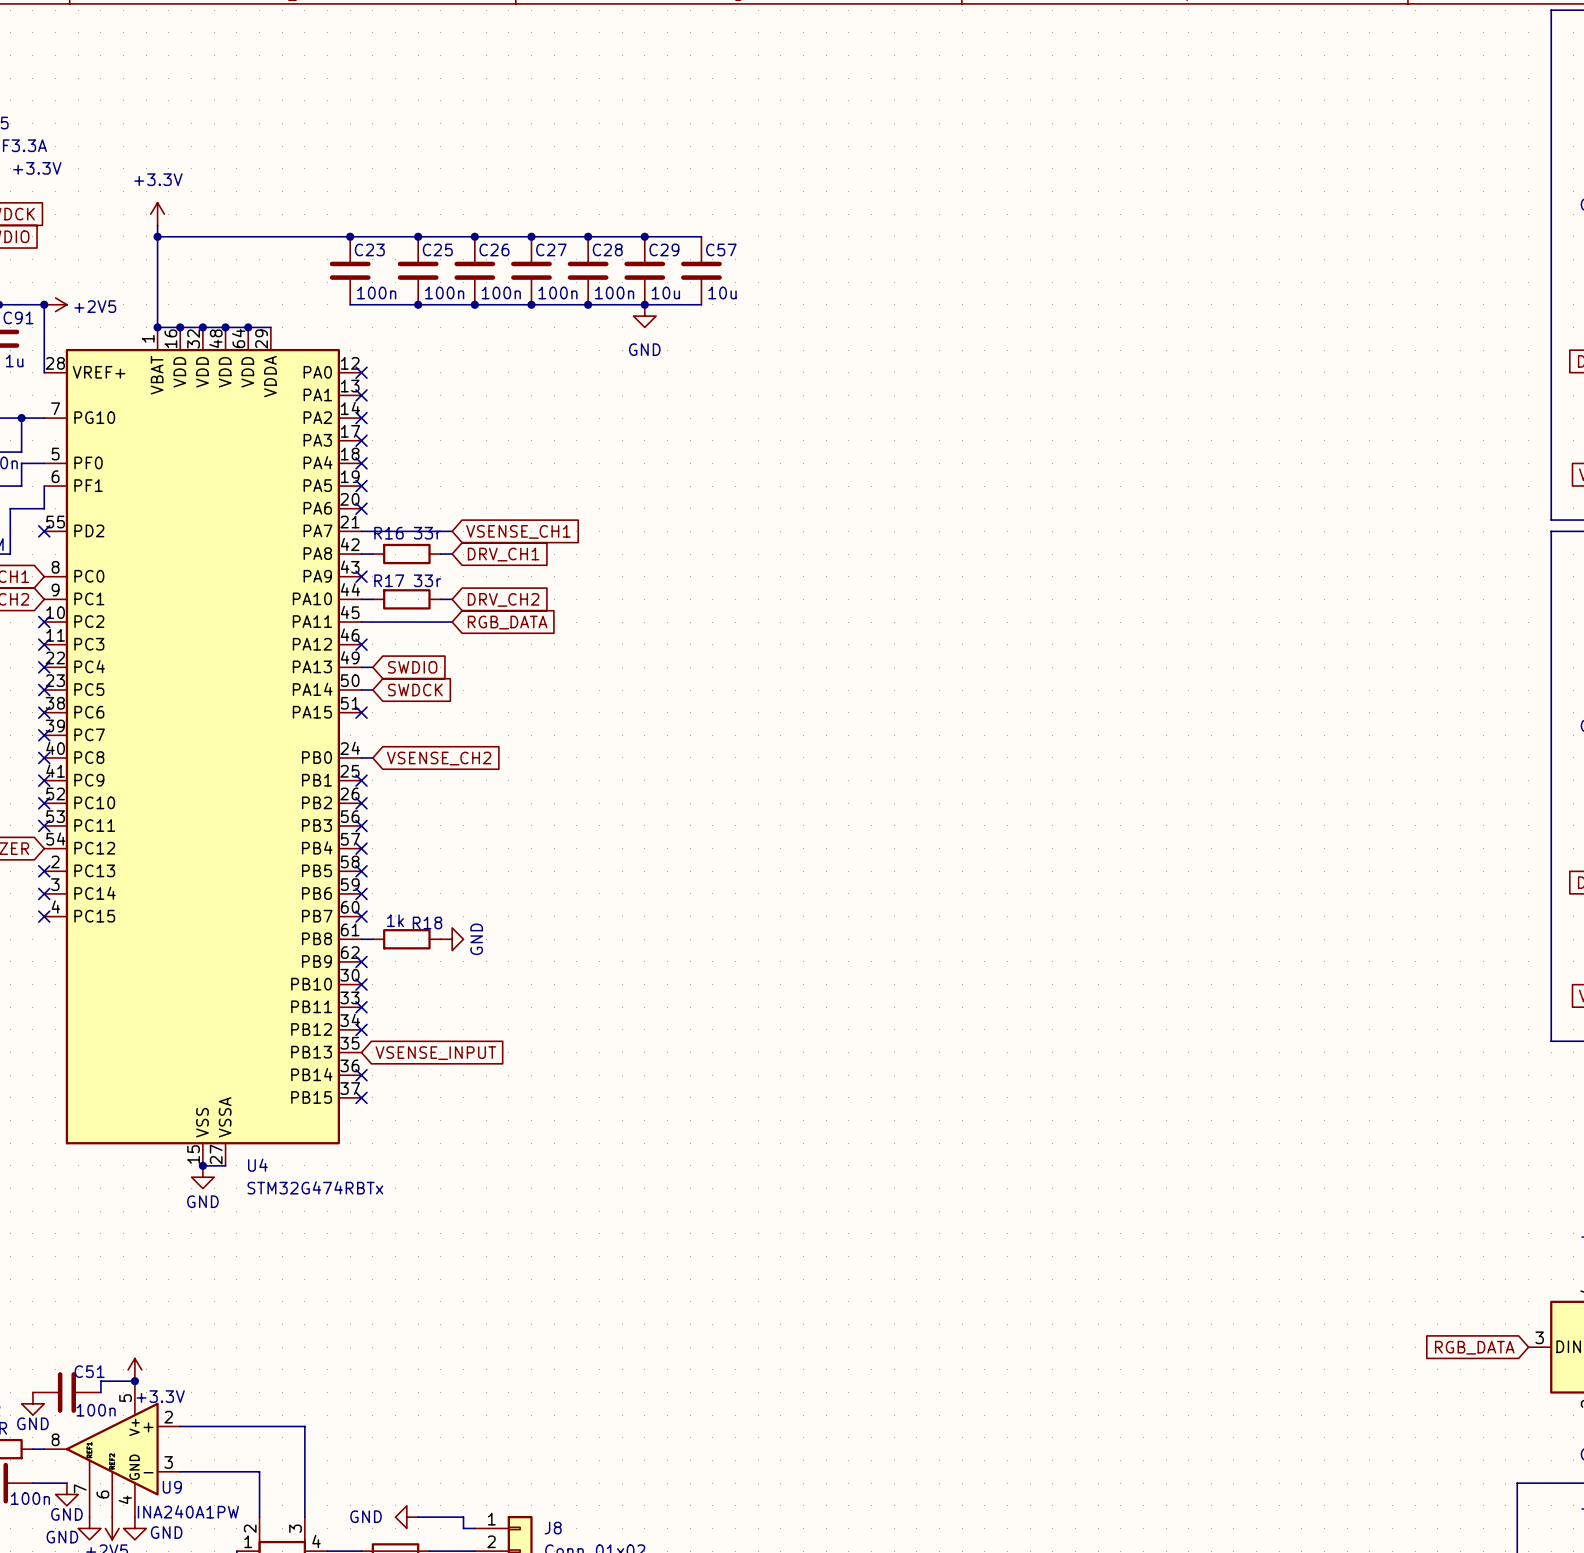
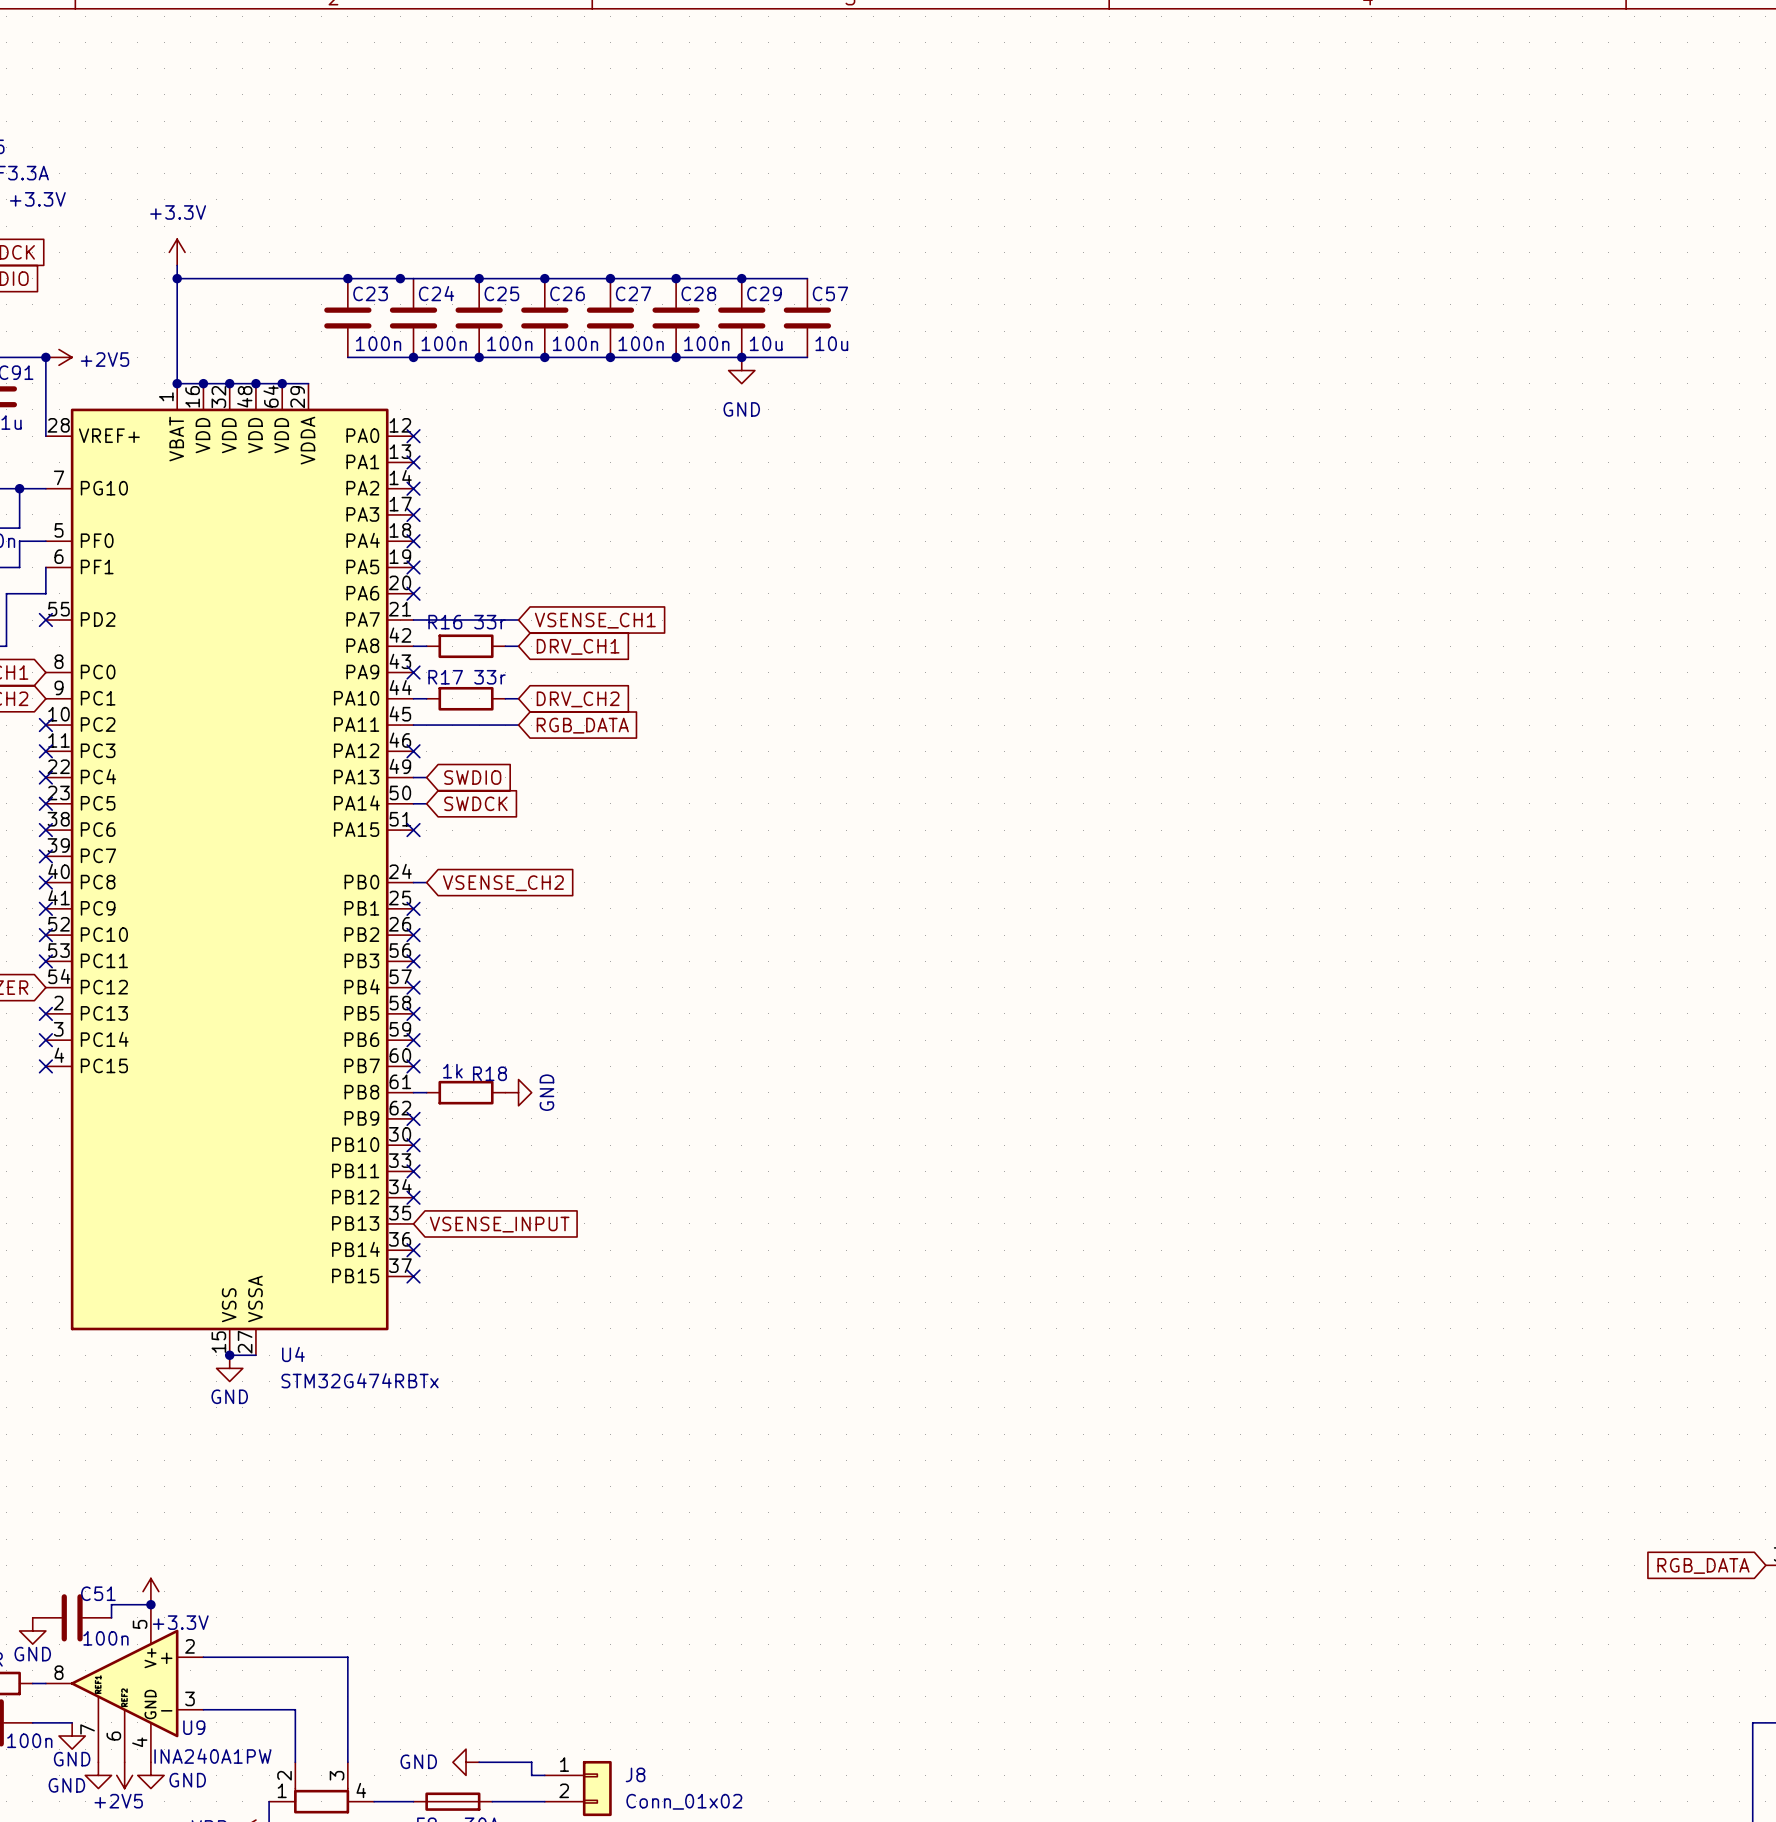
junction: none -> (347, 278)
C23 position: (350, 270) -> (347, 318)
C24: none -> 100n (413, 318)
wire: none -> (347, 357) (400, 357)
junction: none -> (413, 357)

